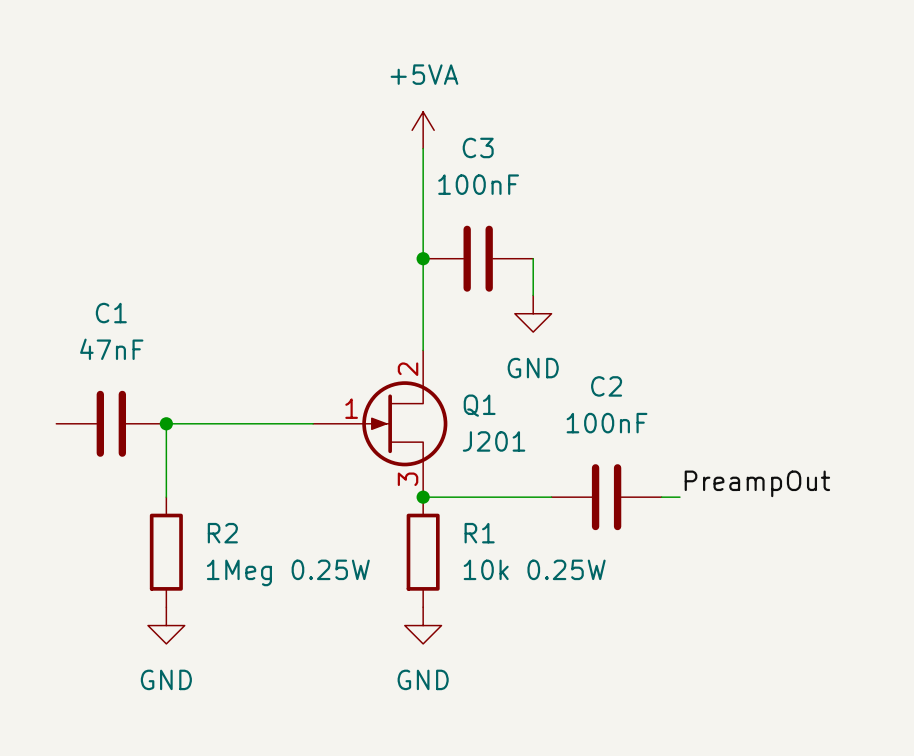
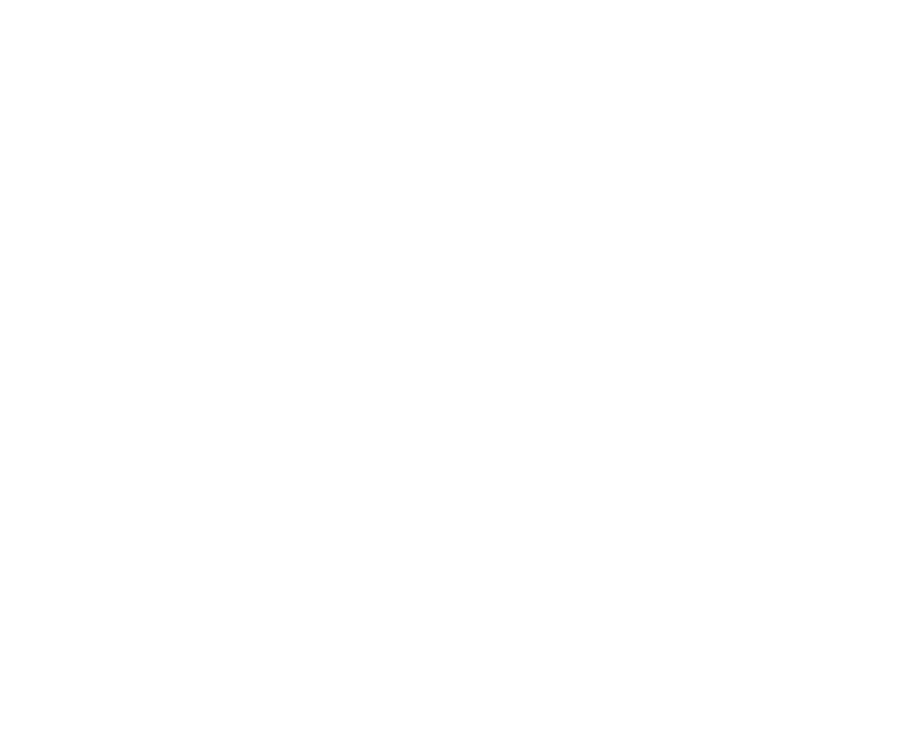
power symbol: +5VA (423, 130) -> none
wire: (423, 148) (423, 350) -> none
junction: (423, 258) -> none
C3: 100nF (478, 258) -> none
wire: (533, 258) (533, 295) -> none
power symbol: GND (533, 313) -> none
C1: 47nF (111, 423) -> none
junction: (166, 423) -> none
wire: (313, 423) (166, 423) (166, 497) -> none
Q1: J201 (380, 423) -> none
label: PreampOut (757, 483) -> none
wire: (423, 497) (551, 497) -> none
junction: (423, 497) -> none
C2: 100nF (606, 497) -> none
wire: (661, 497) (679, 497) -> none
R2: 1Meg 0.25W (166, 552) -> none
R1: 10k 0.25W (423, 552) -> none
power symbol: GND (166, 625) -> none
power symbol: GND (423, 625) -> none

